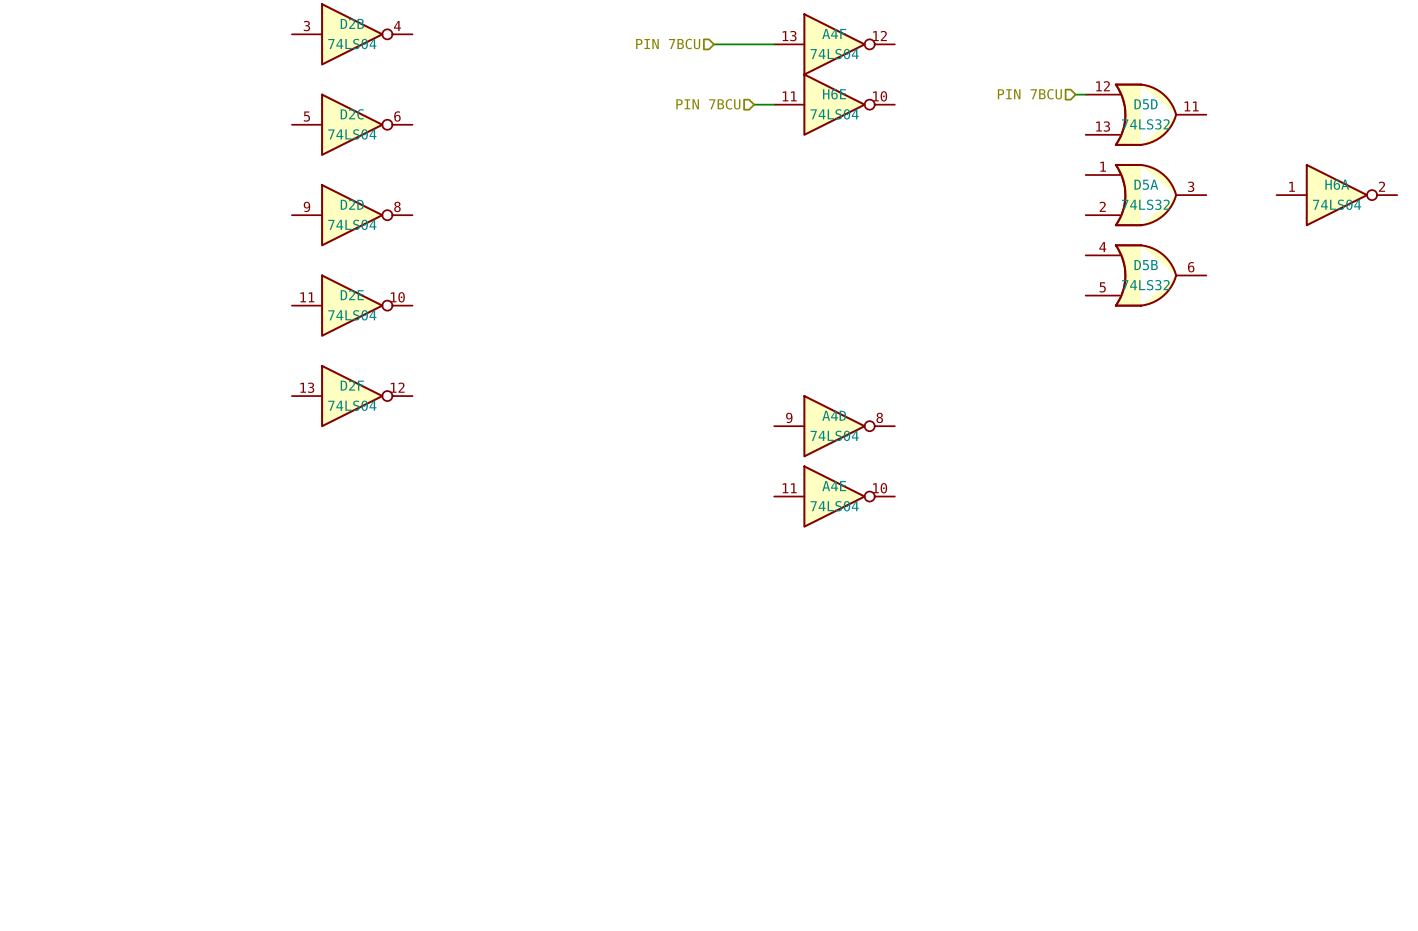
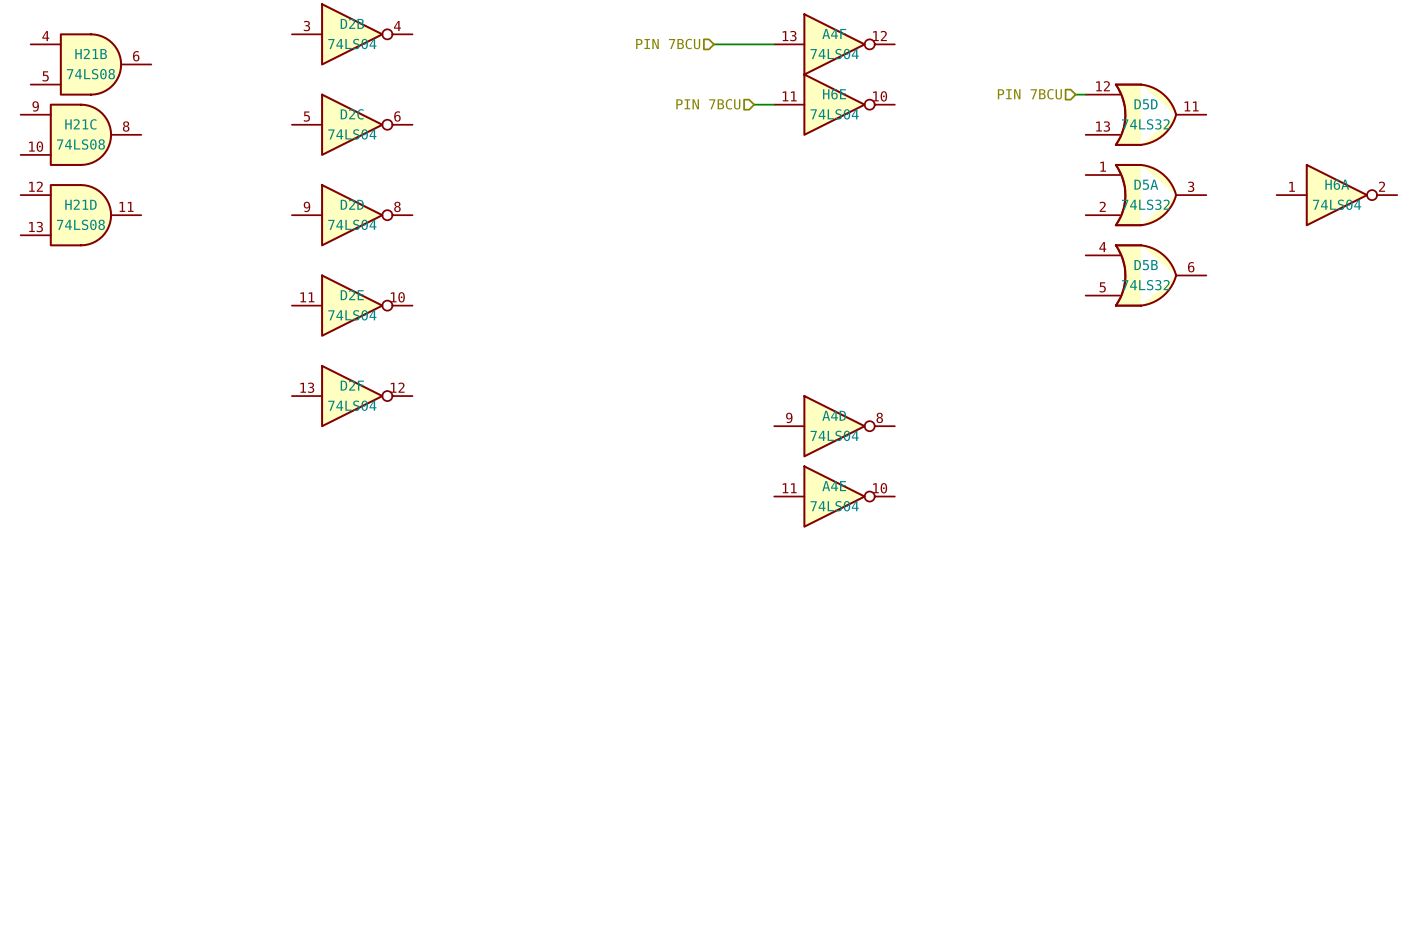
H21B: none -> 74LS08 (90, 64)
H21C: none -> 74LS08 (80, 134)
H21D: none -> 74LS08 (80, 215)

